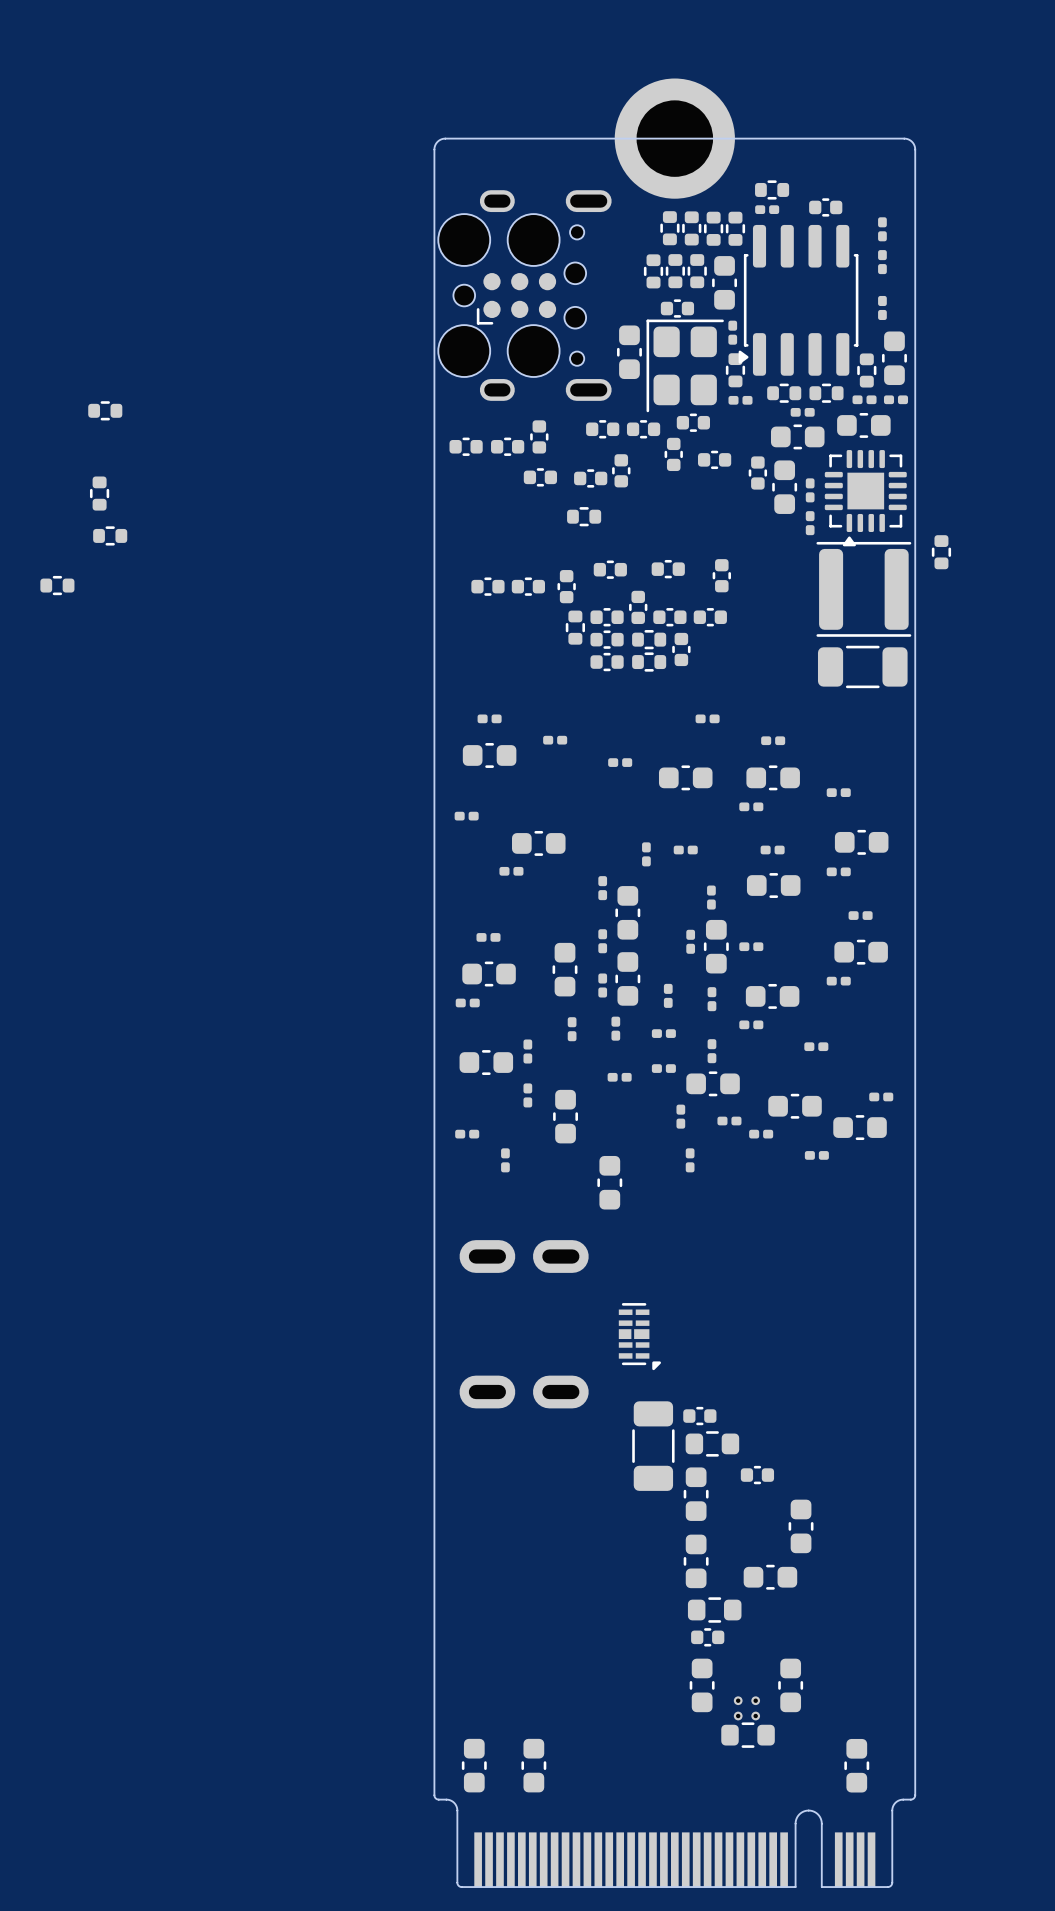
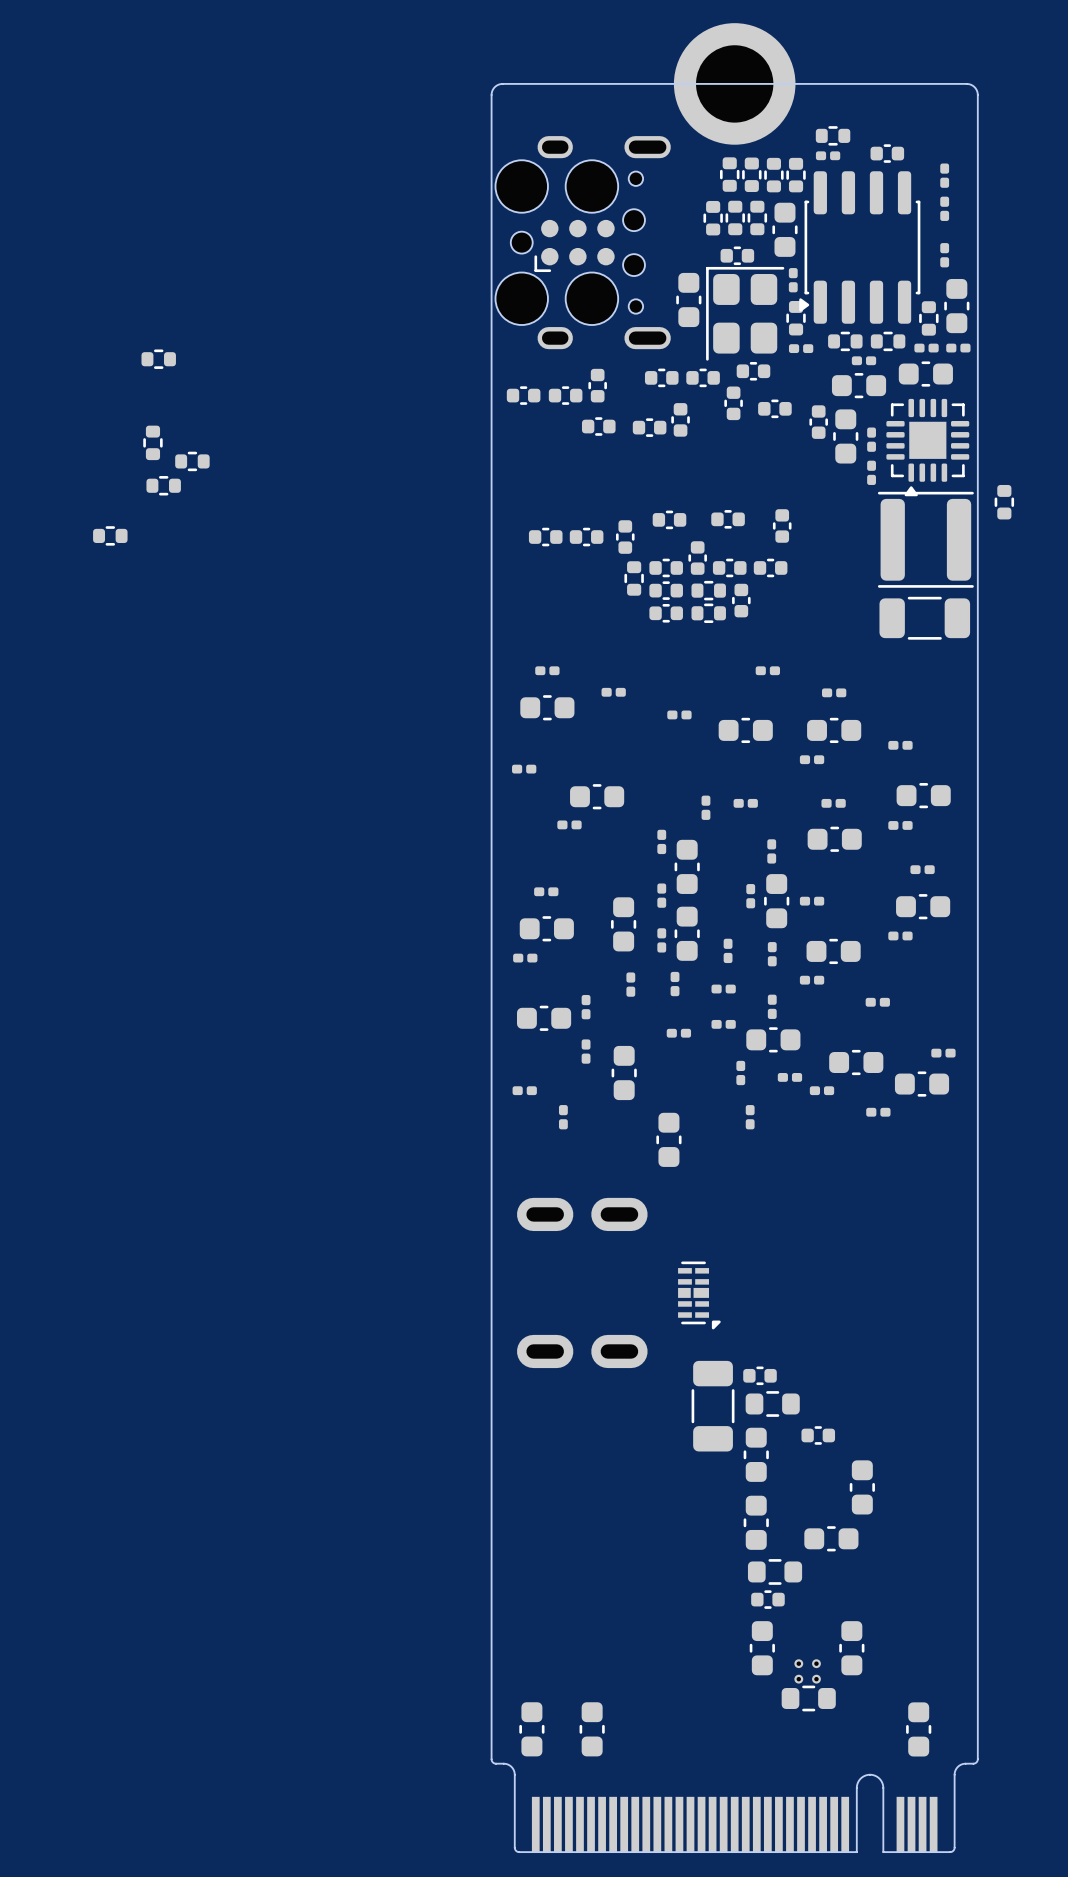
part position: (584, 516) -> (192, 461)

